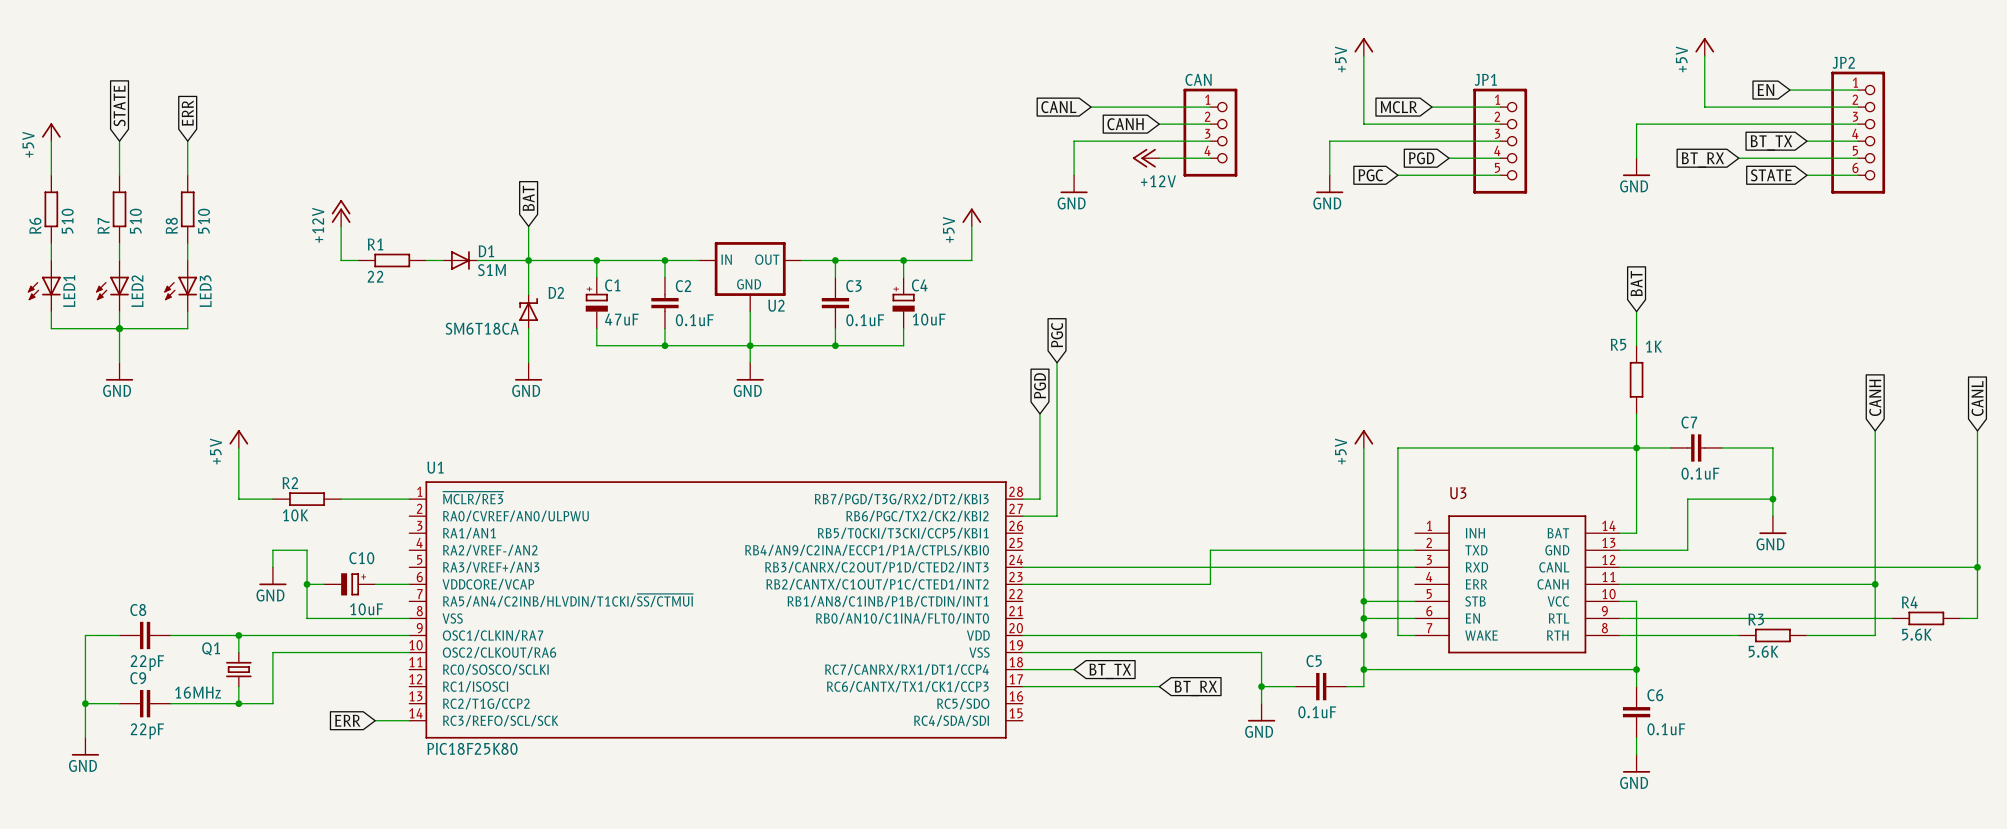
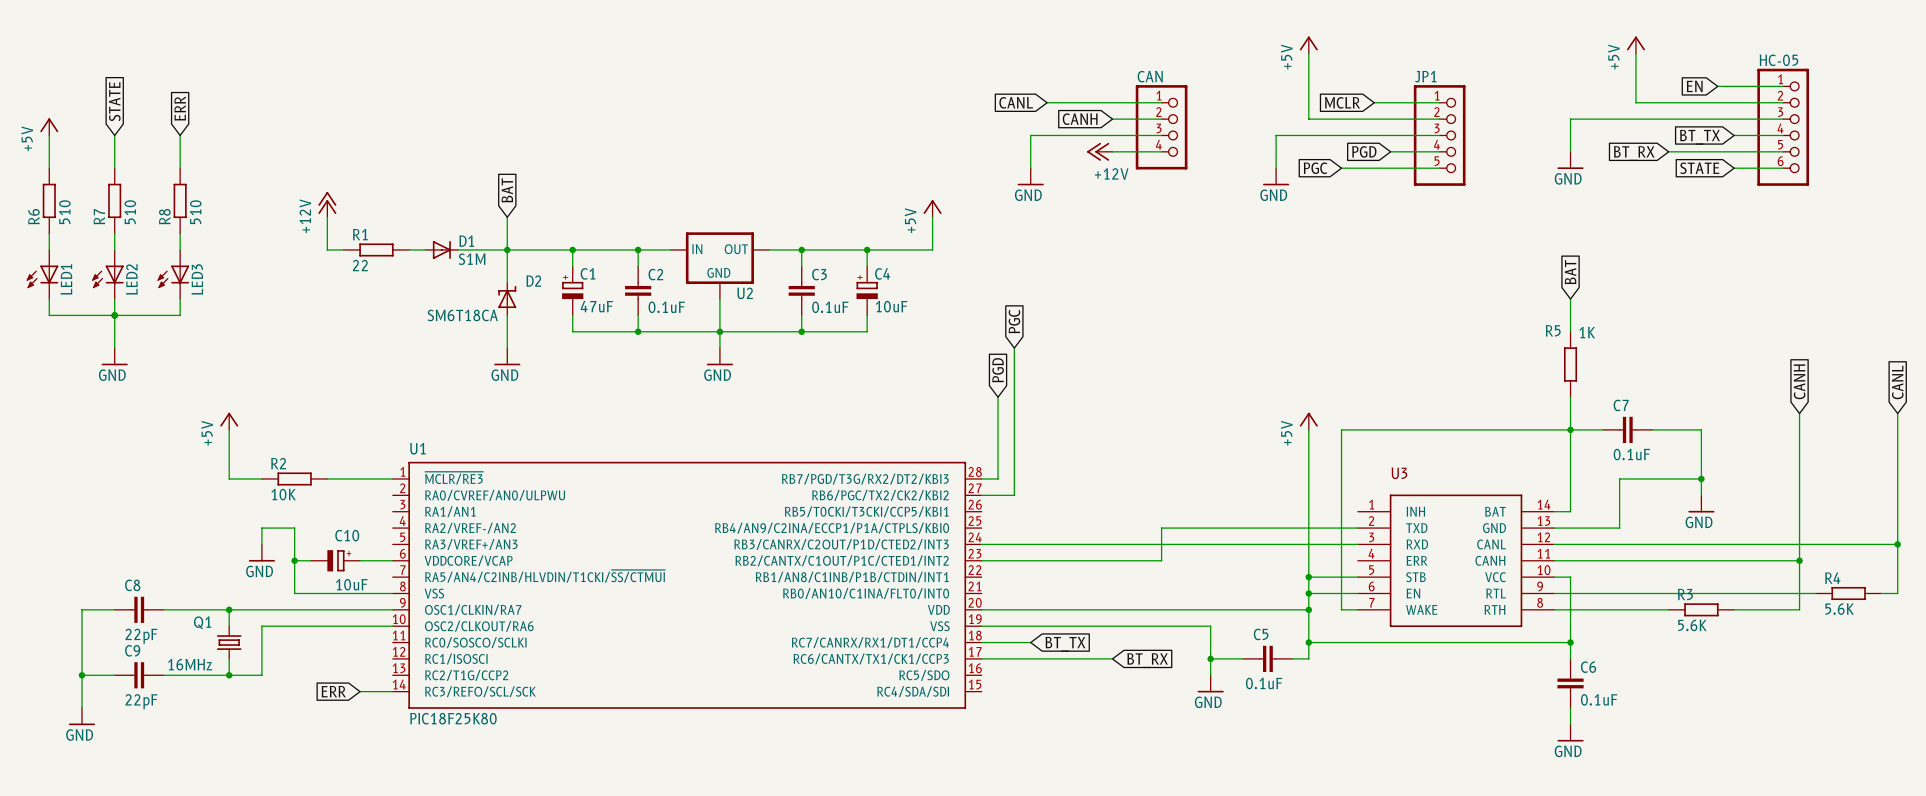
JP2 name: JP2 (1843, 62) -> HC-05 (1778, 60)

